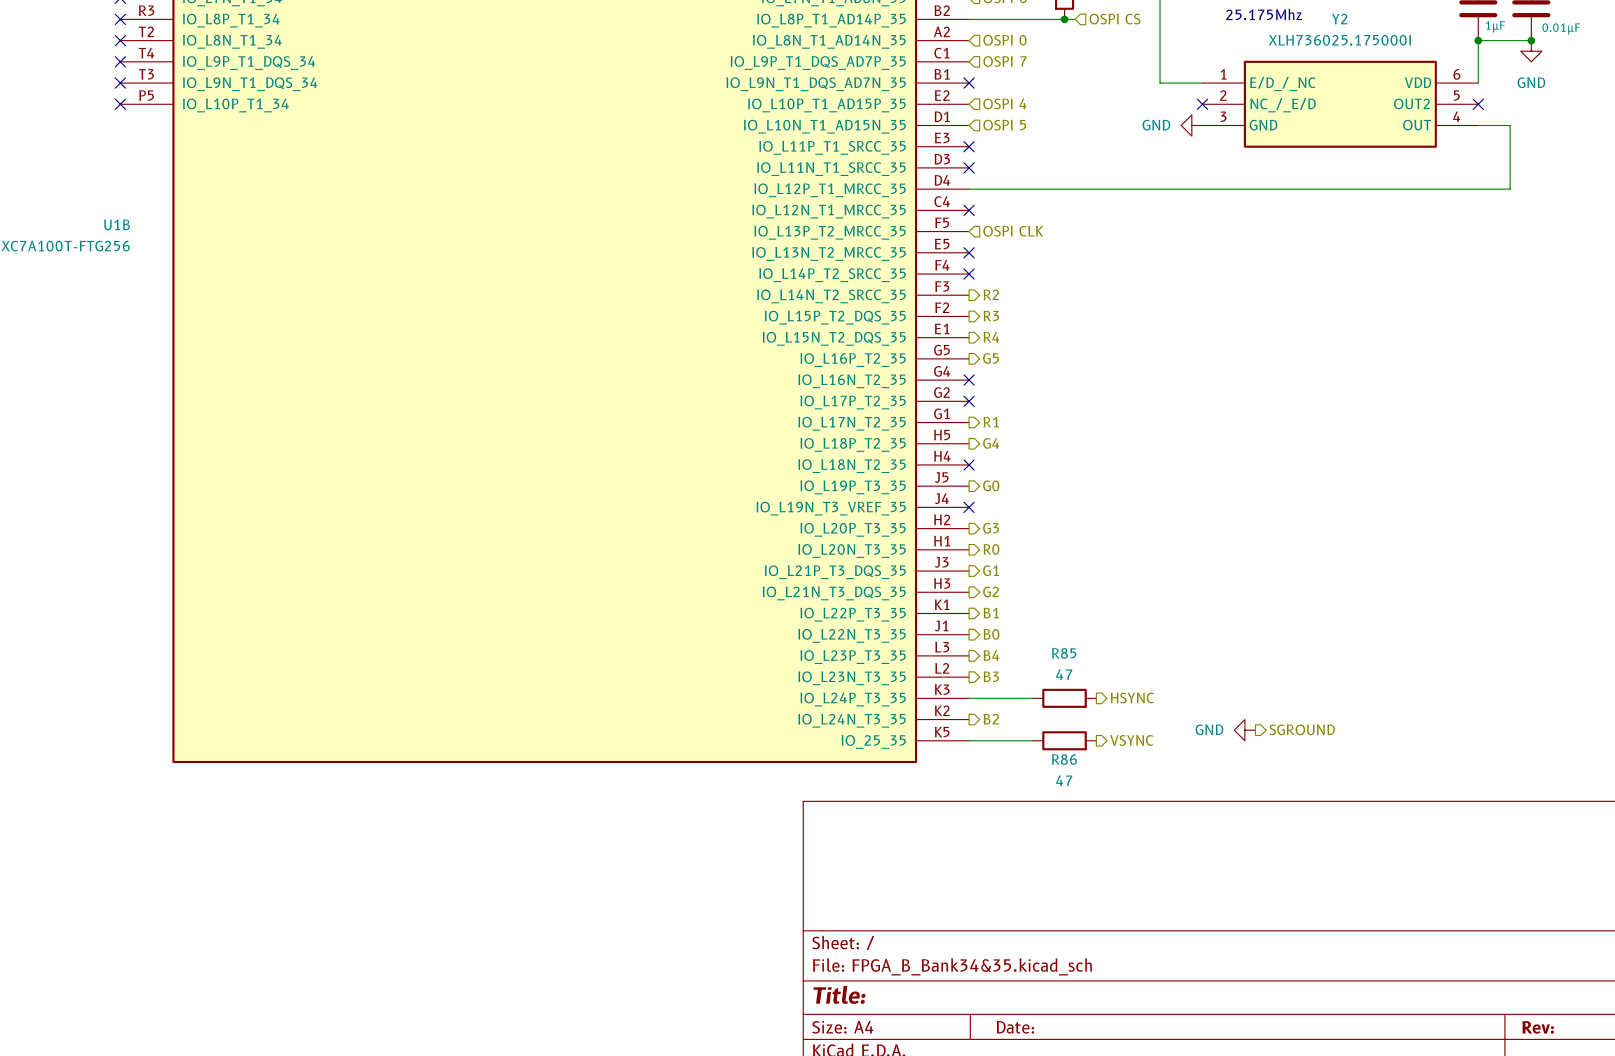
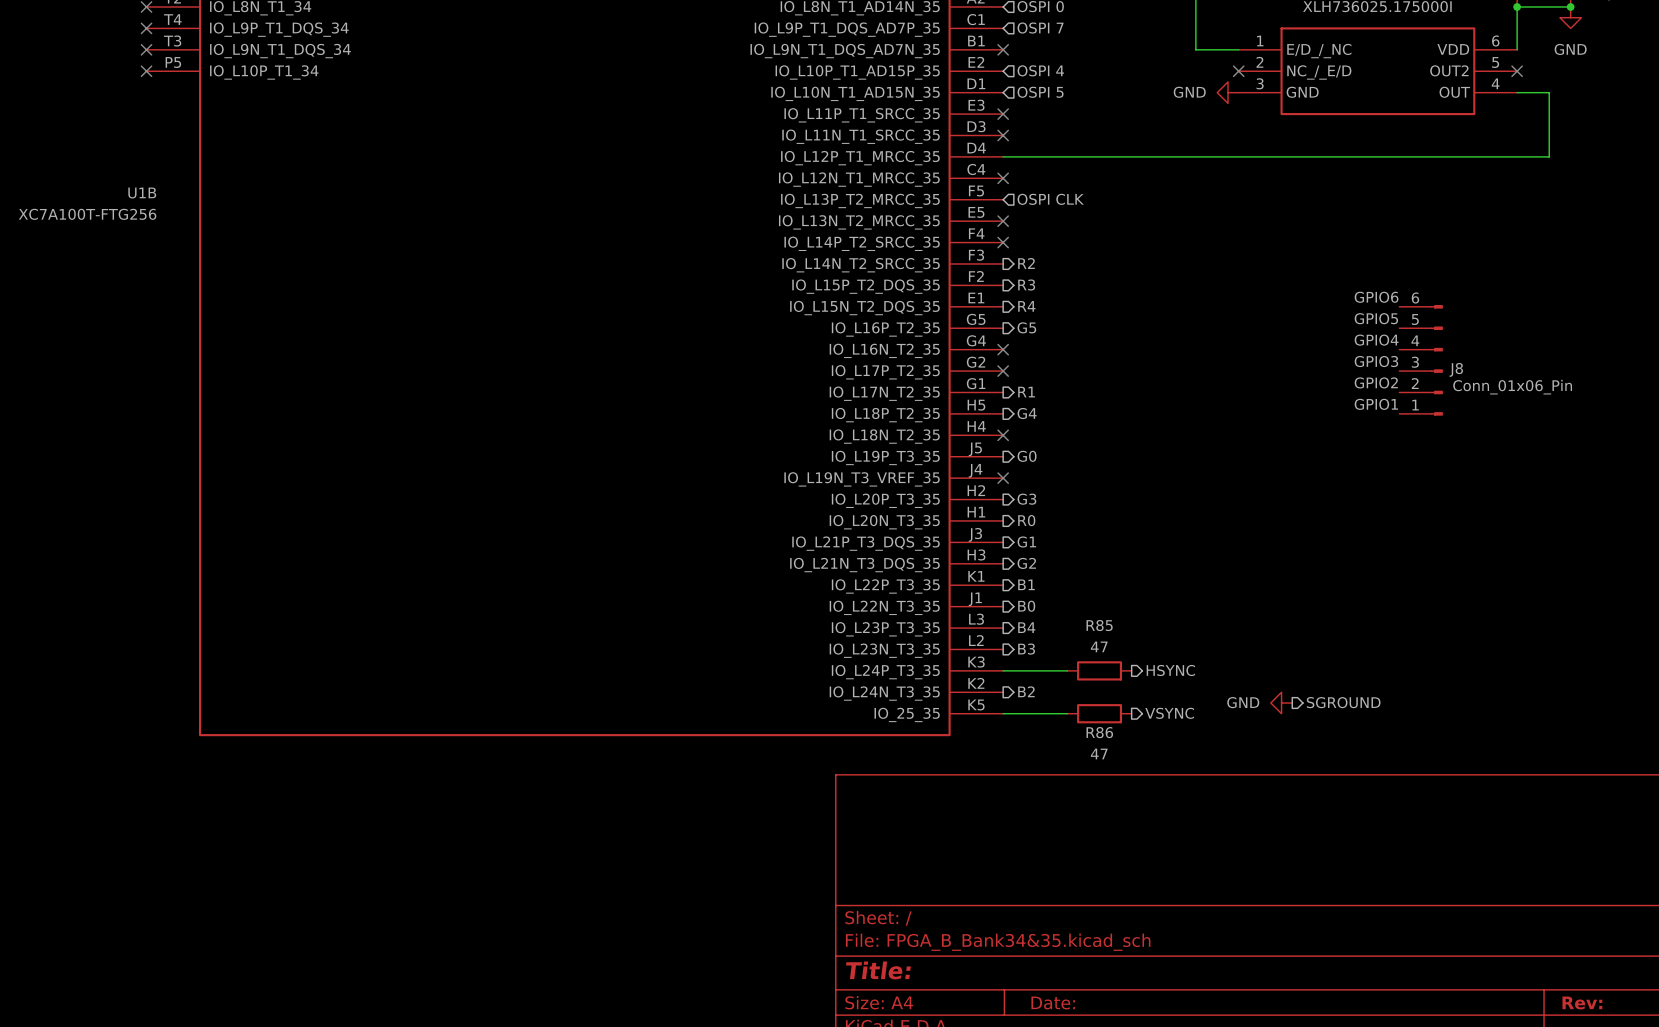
label: none -> GPIO6 (1376, 297)
label: none -> GPIO5 (1376, 318)
label: none -> GPIO4 (1376, 340)
J8: none -> Conn_01x06_Pin (1421, 360)
label: none -> GPIO3 (1376, 361)
label: none -> GPIO2 (1376, 382)
label: none -> GPIO1 (1376, 404)

